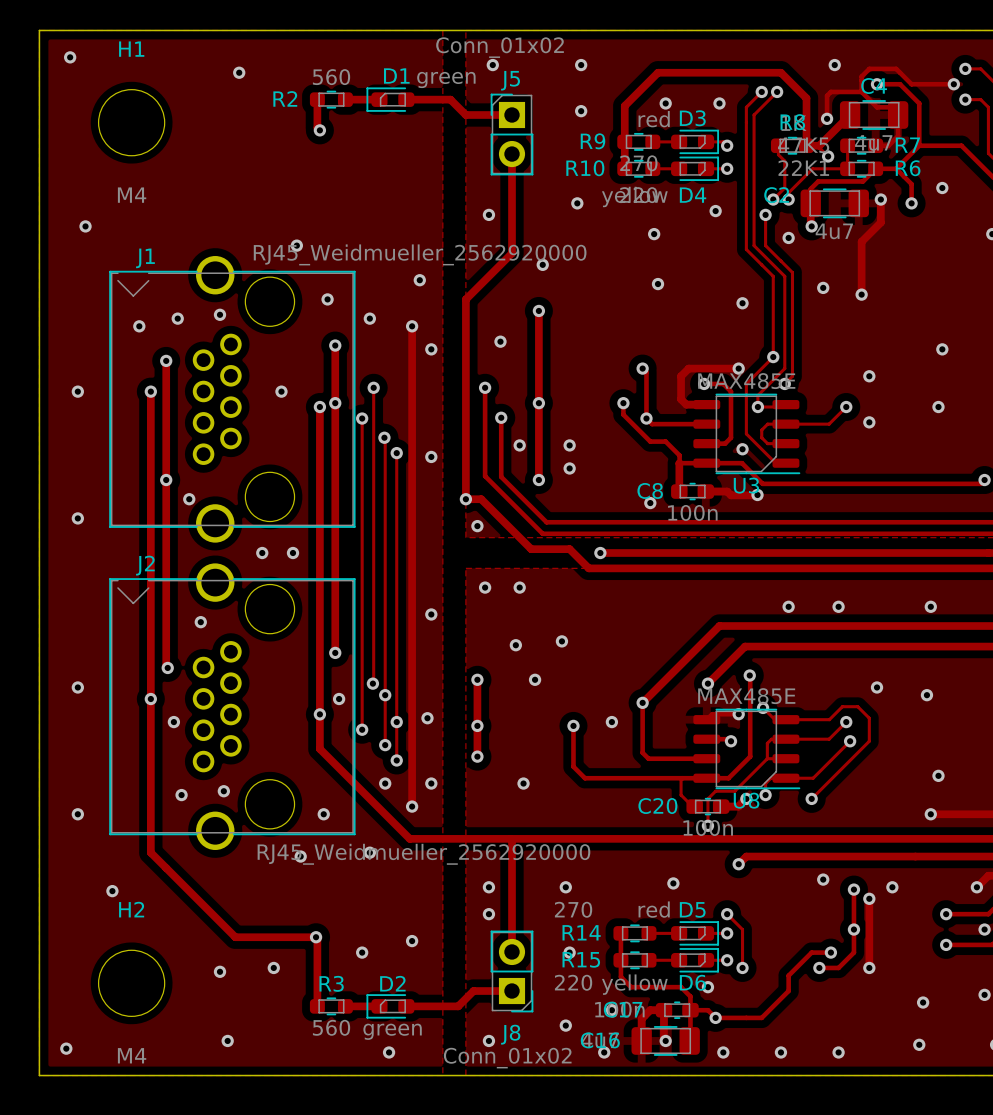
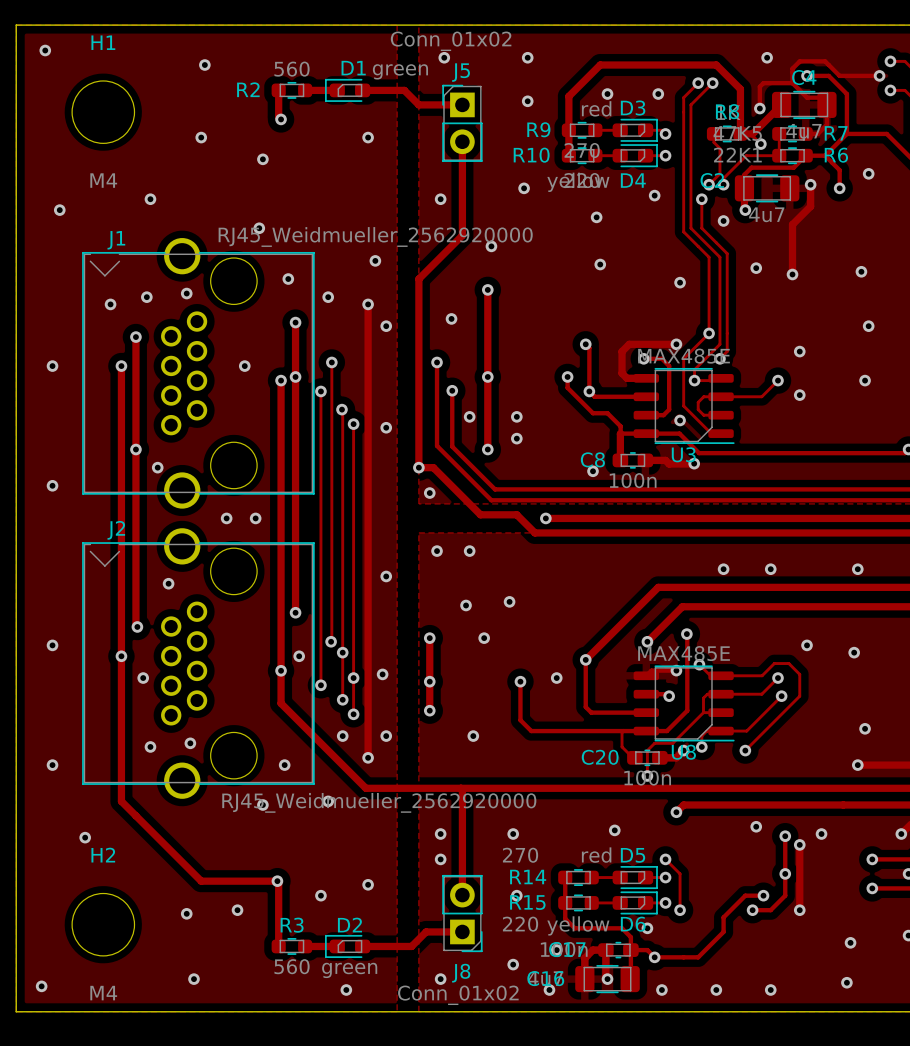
via: none -> (201, 137)
via: none -> (368, 137)
via: none -> (262, 159)
via: none -> (150, 199)
via: none -> (861, 271)

